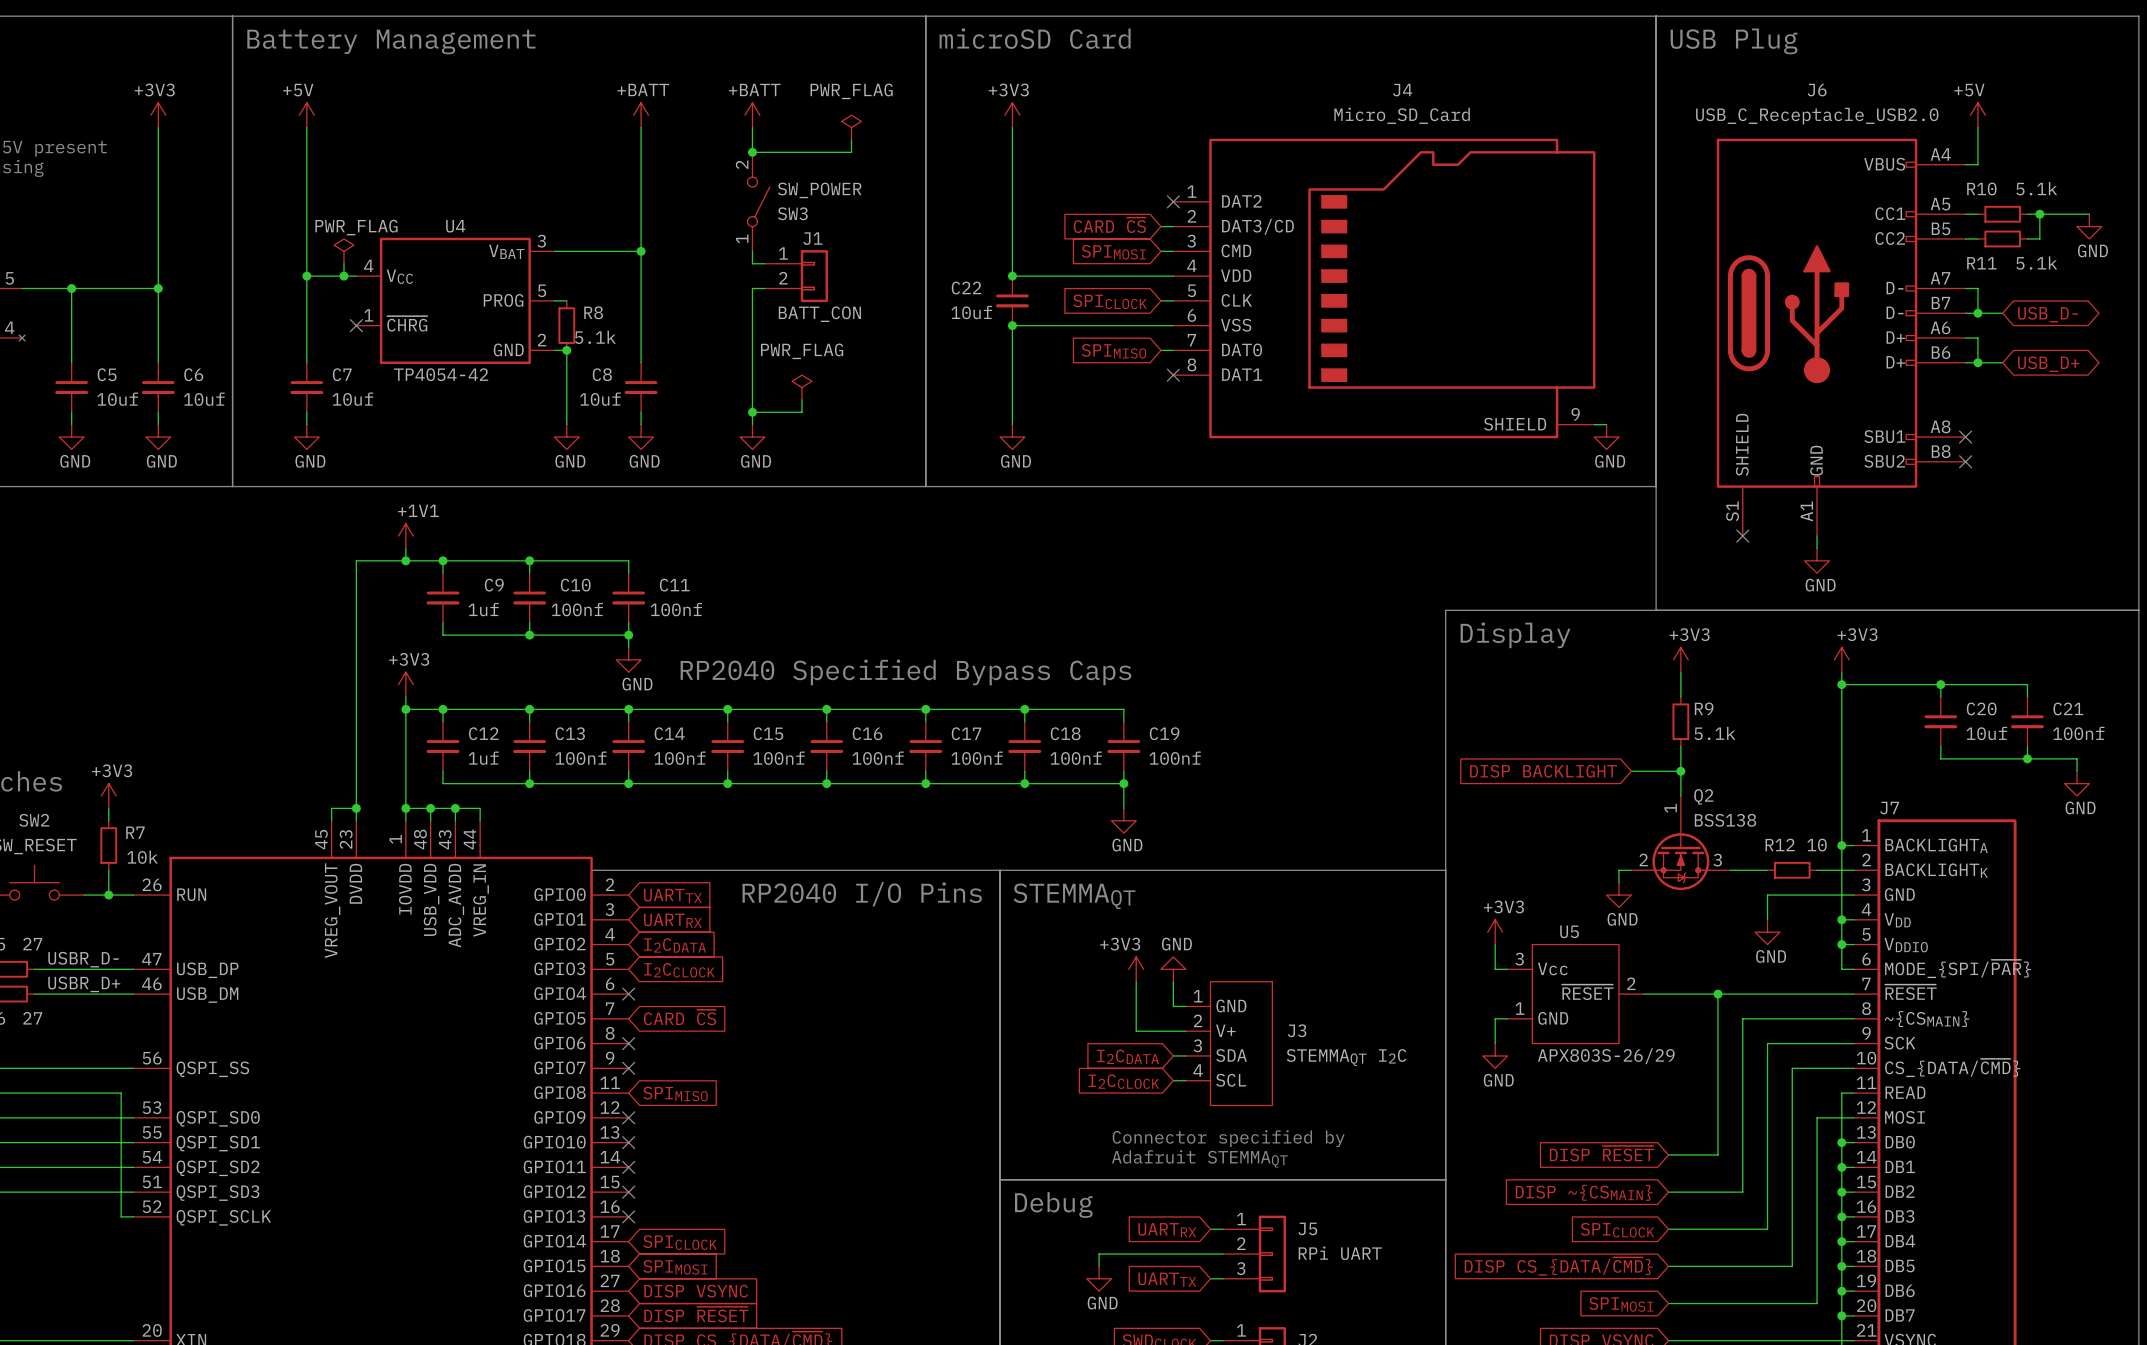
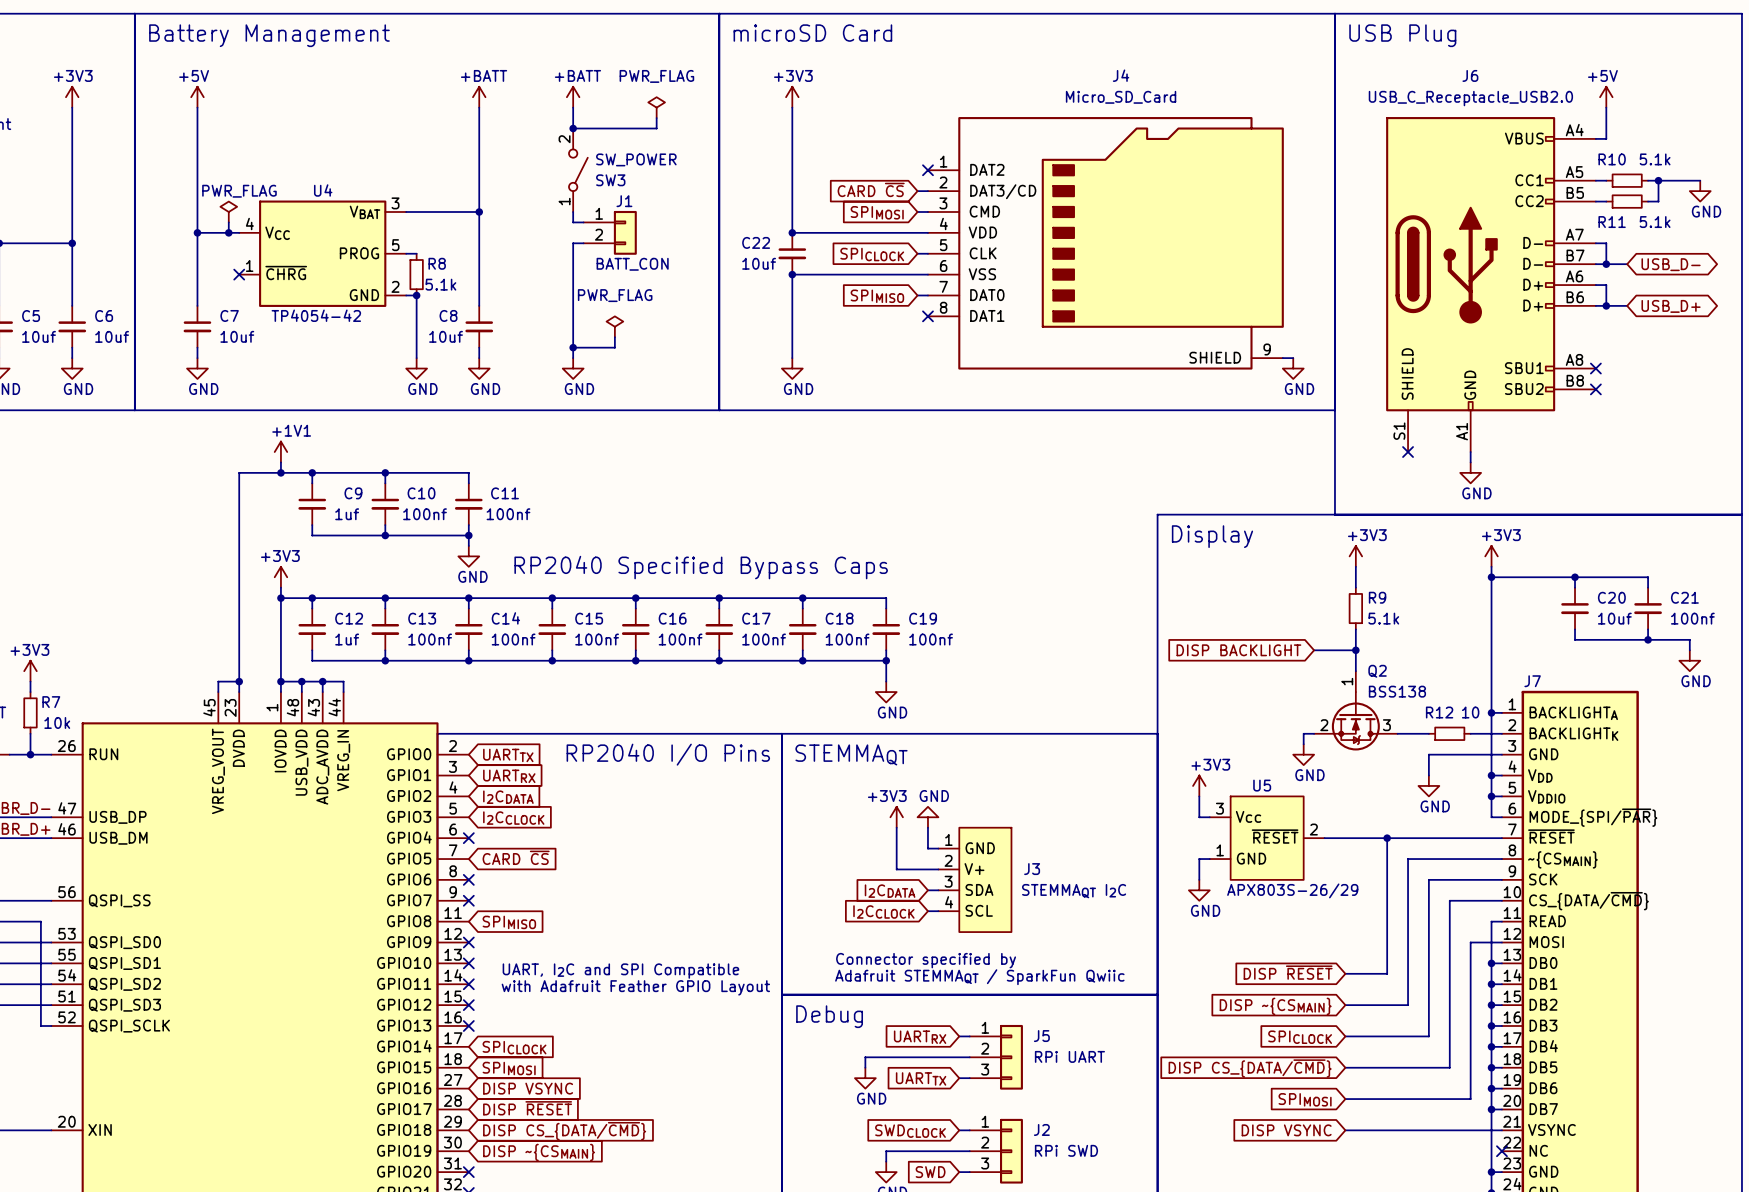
text position: Connector specified by (1228, 1138) -> Connector specified by (926, 960)
text: none -> UART, I2C and SPI Compatible (620, 971)
text: Adafruit STEMMAQT (1199, 1158) -> Adafruit STEMMAQT / SparkFun Qwiic (979, 977)
text: none -> with Adafruit Feather GPIO Layout (635, 987)

